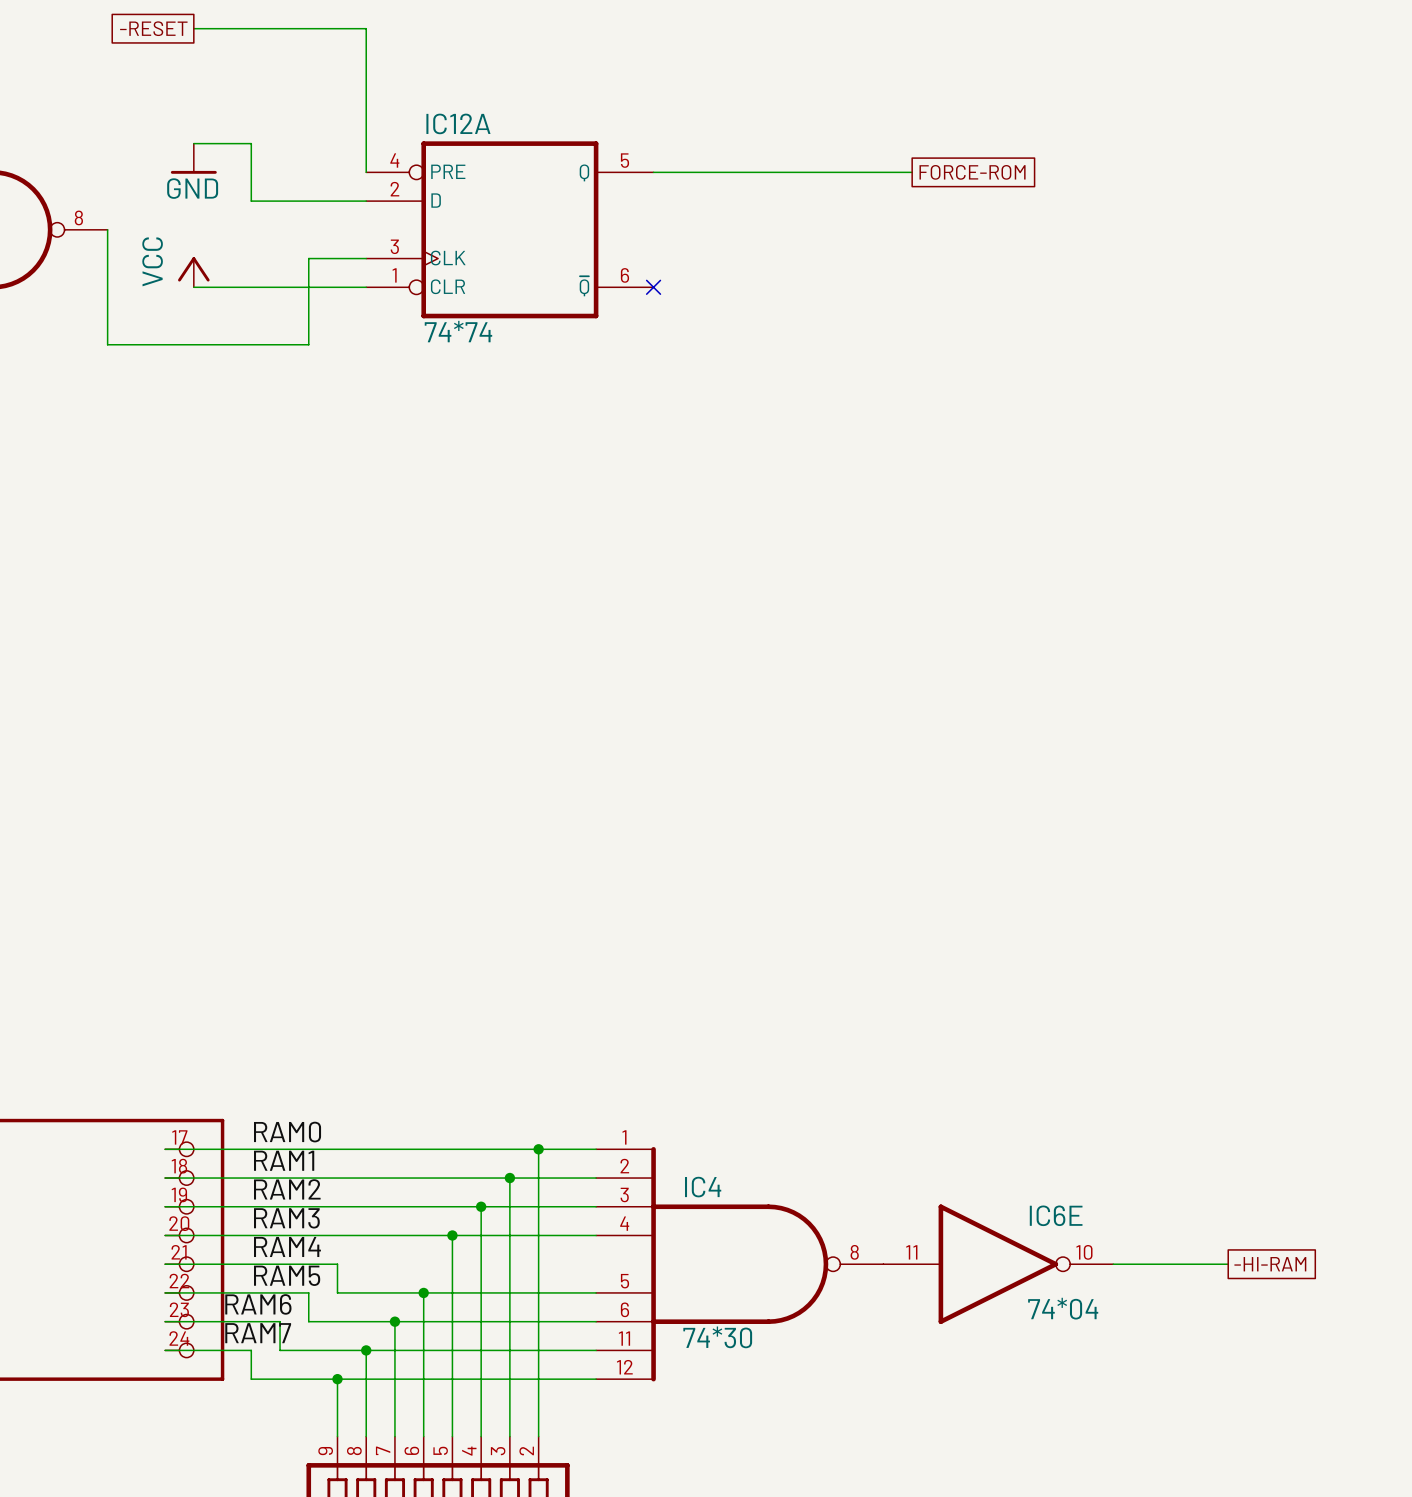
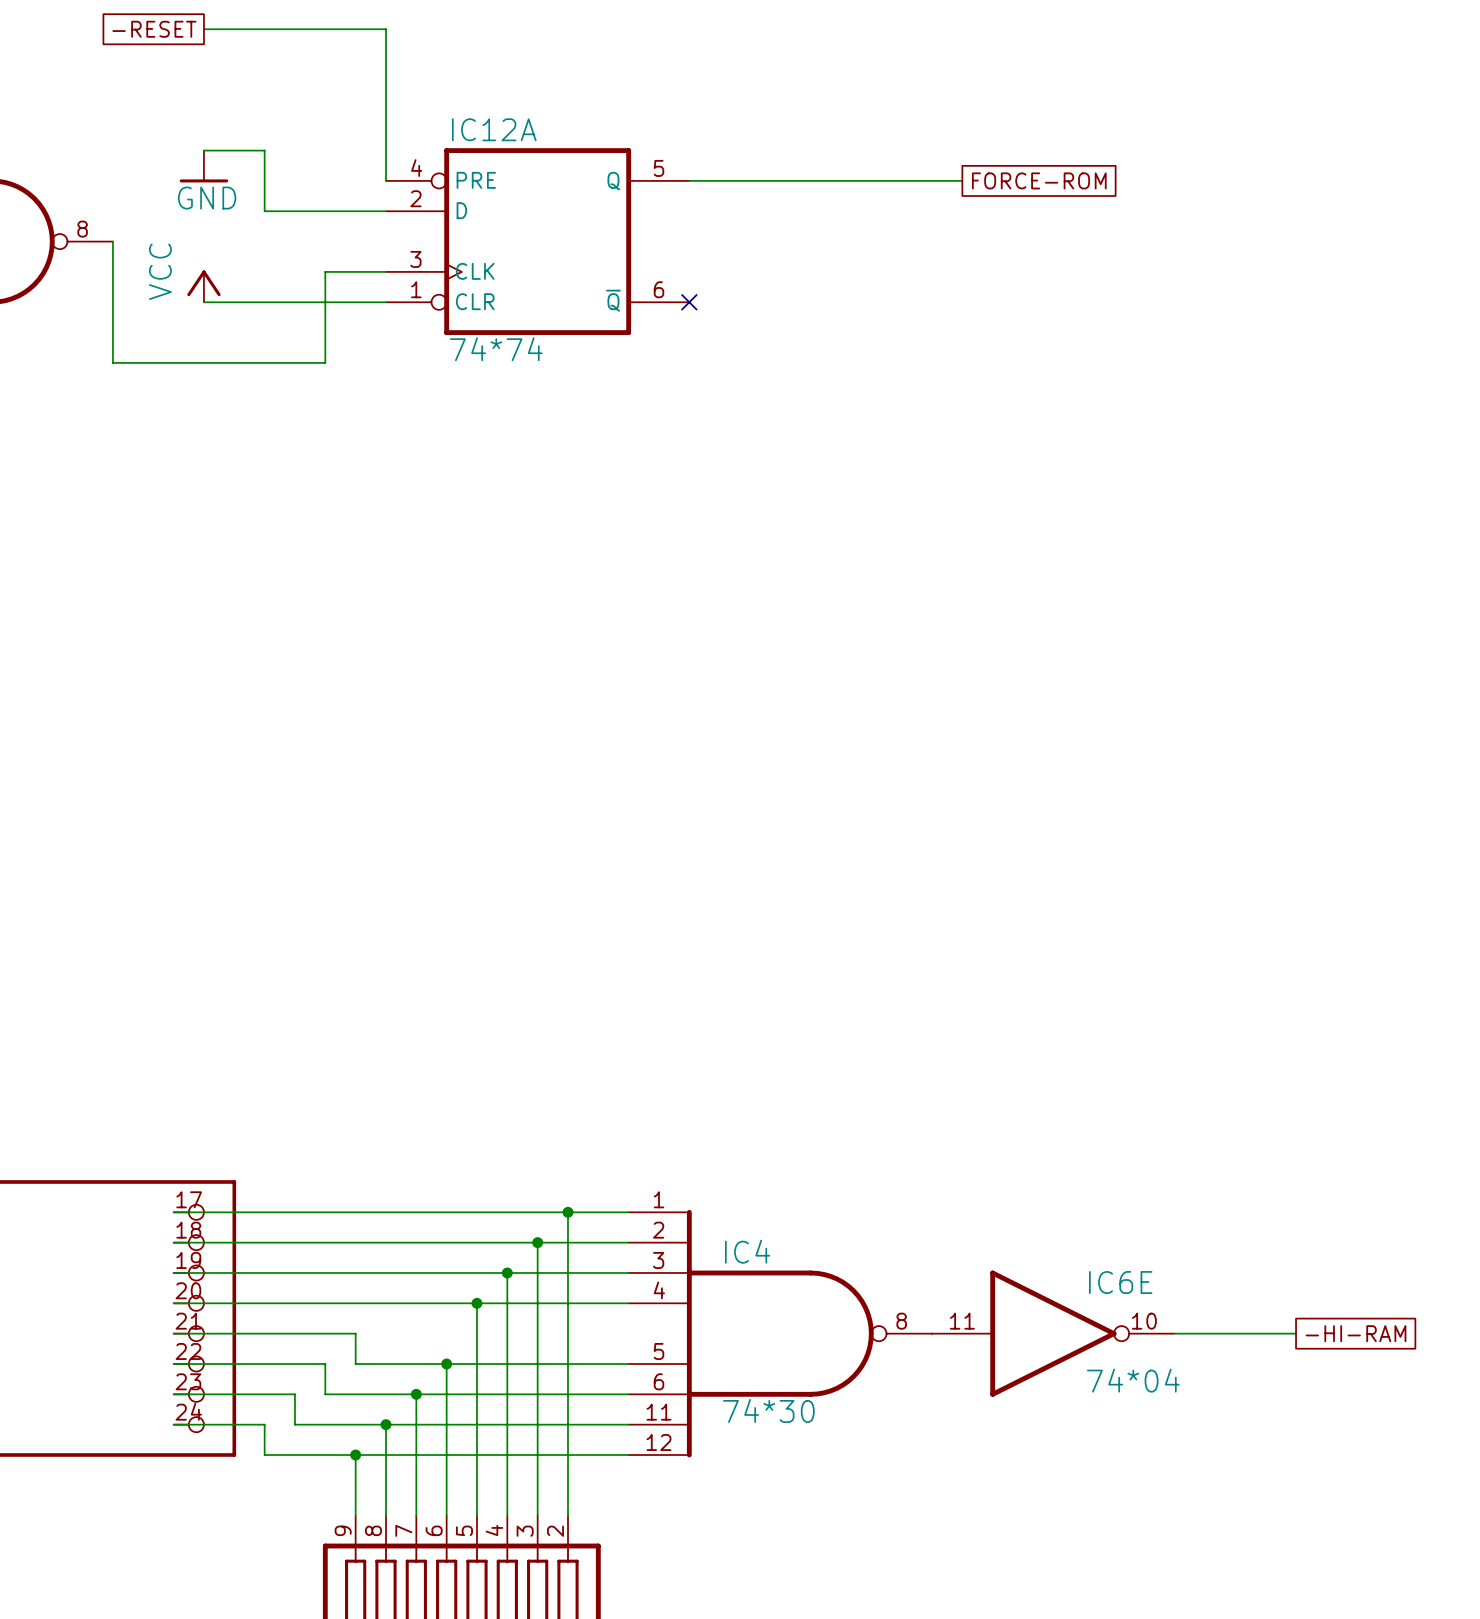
label: RAM0 (287, 1132) -> none
label: RAM1 (284, 1160) -> none
label: RAM2 (287, 1189) -> none
label: RAM3 (286, 1218) -> none
label: RAM4 (287, 1246) -> none
label: RAM5 (287, 1275) -> none
label: RAM6 (258, 1304) -> none
label: RAM7 (258, 1333) -> none

